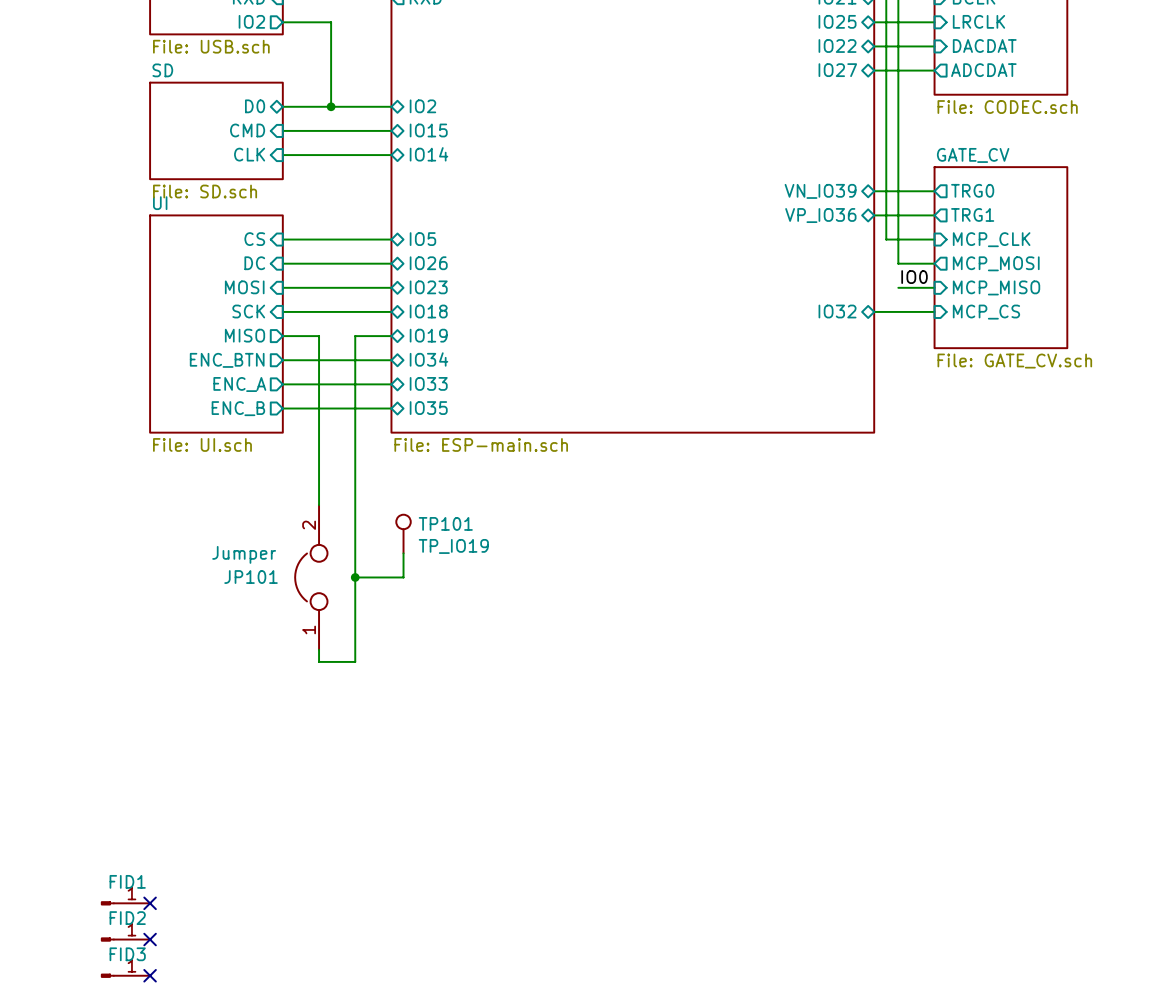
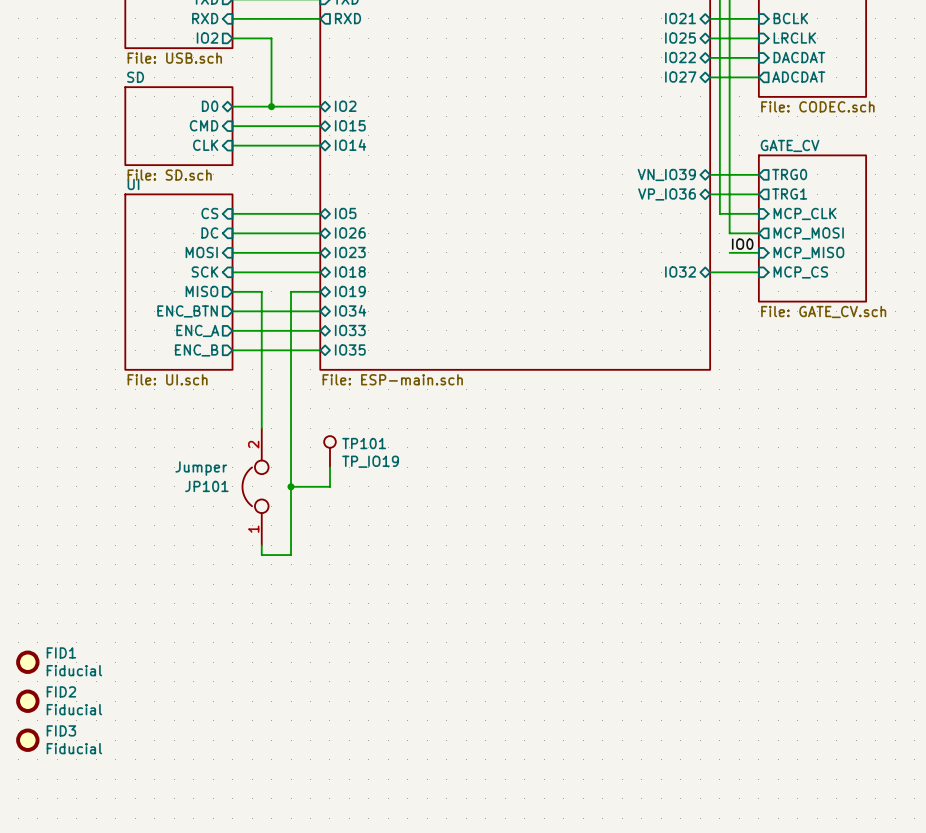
FID1 value: none -> Fiducial (74, 670)
FID2 value: none -> Fiducial (74, 709)
FID1 name position: FID1 (127, 881) -> FID1 (61, 652)
FID3 value: none -> Fiducial (74, 748)
FID1 symbol: [101, 901, 151, 906] -> [16, 650, 40, 674]
no-connect mark: (150, 903) -> none
FID2 name position: FID2 (127, 918) -> FID2 (61, 691)
FID2 symbol: [101, 937, 151, 942] -> [16, 689, 40, 713]
no-connect mark: (150, 939) -> none
FID3 name position: FID3 (127, 954) -> FID3 (61, 730)
FID3 symbol: [101, 973, 151, 978] -> [16, 728, 40, 752]
no-connect mark: (150, 975) -> none

